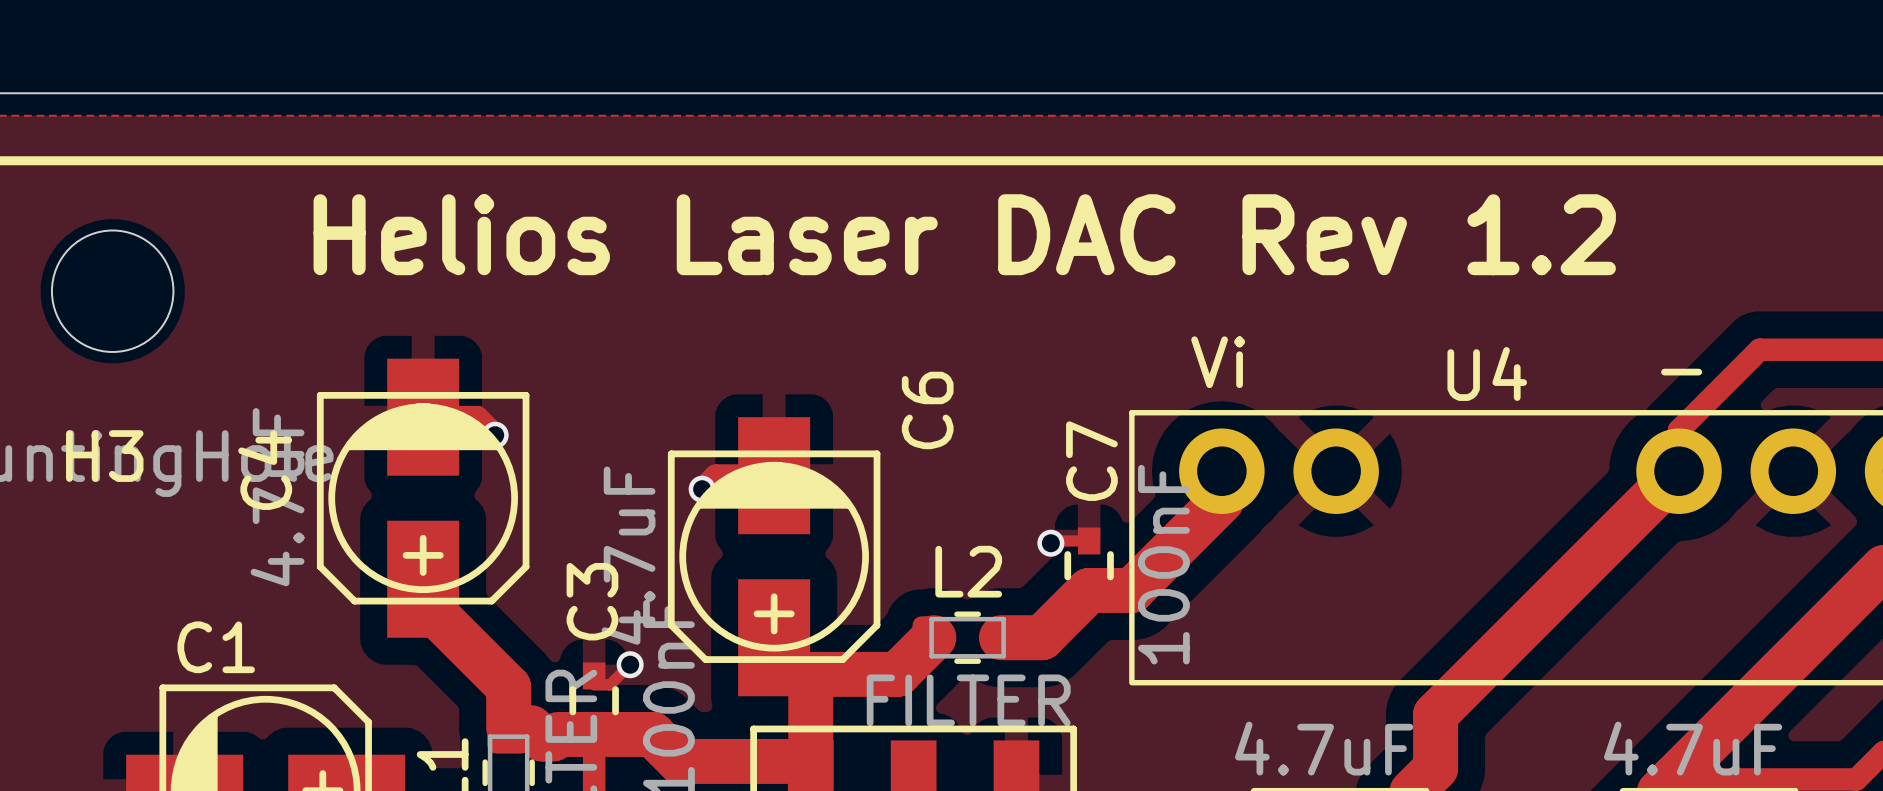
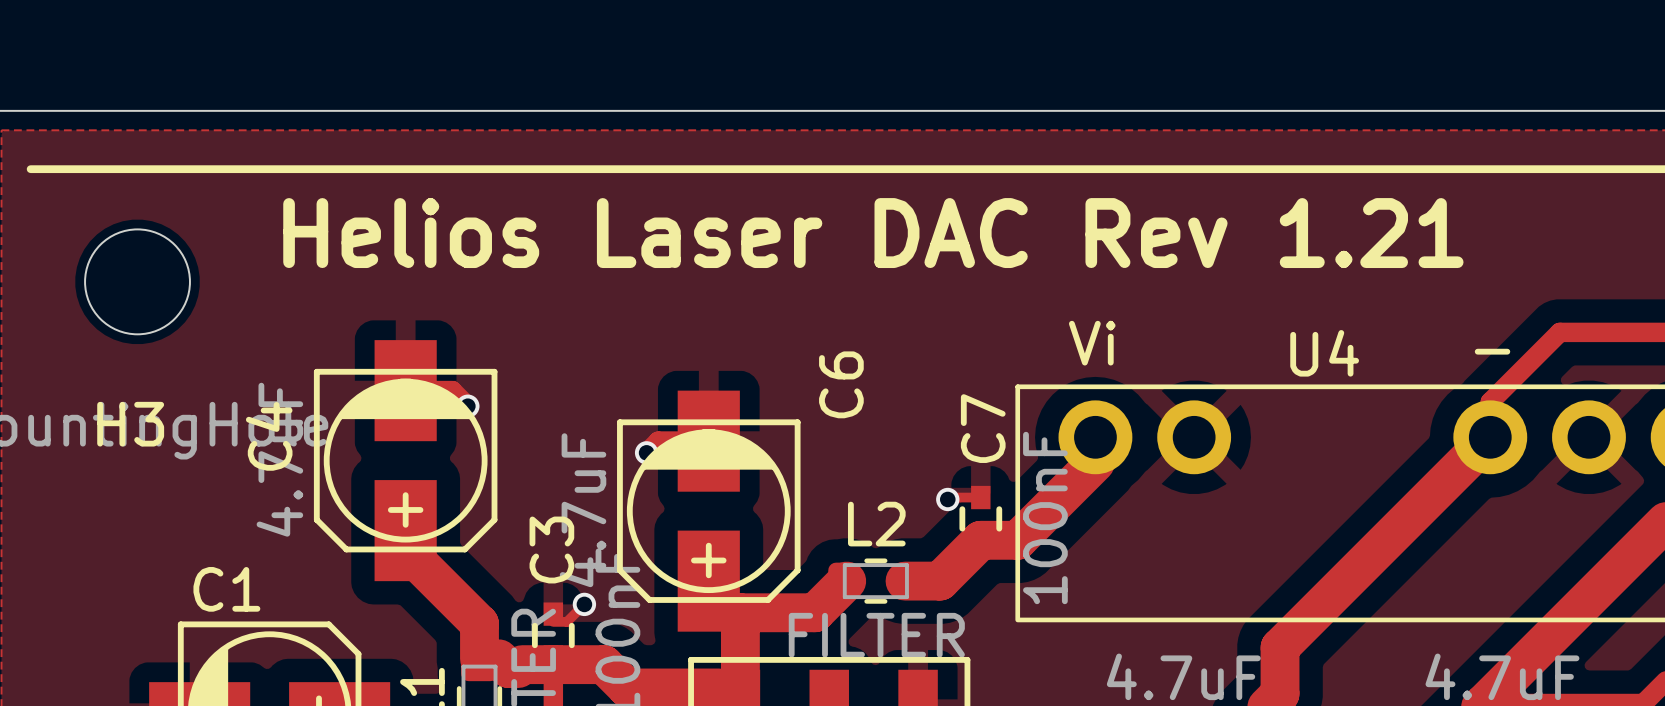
text: Helios Laser DAC Rev 1.2 (964, 234) -> Helios Laser DAC Rev 1.21 (873, 233)

